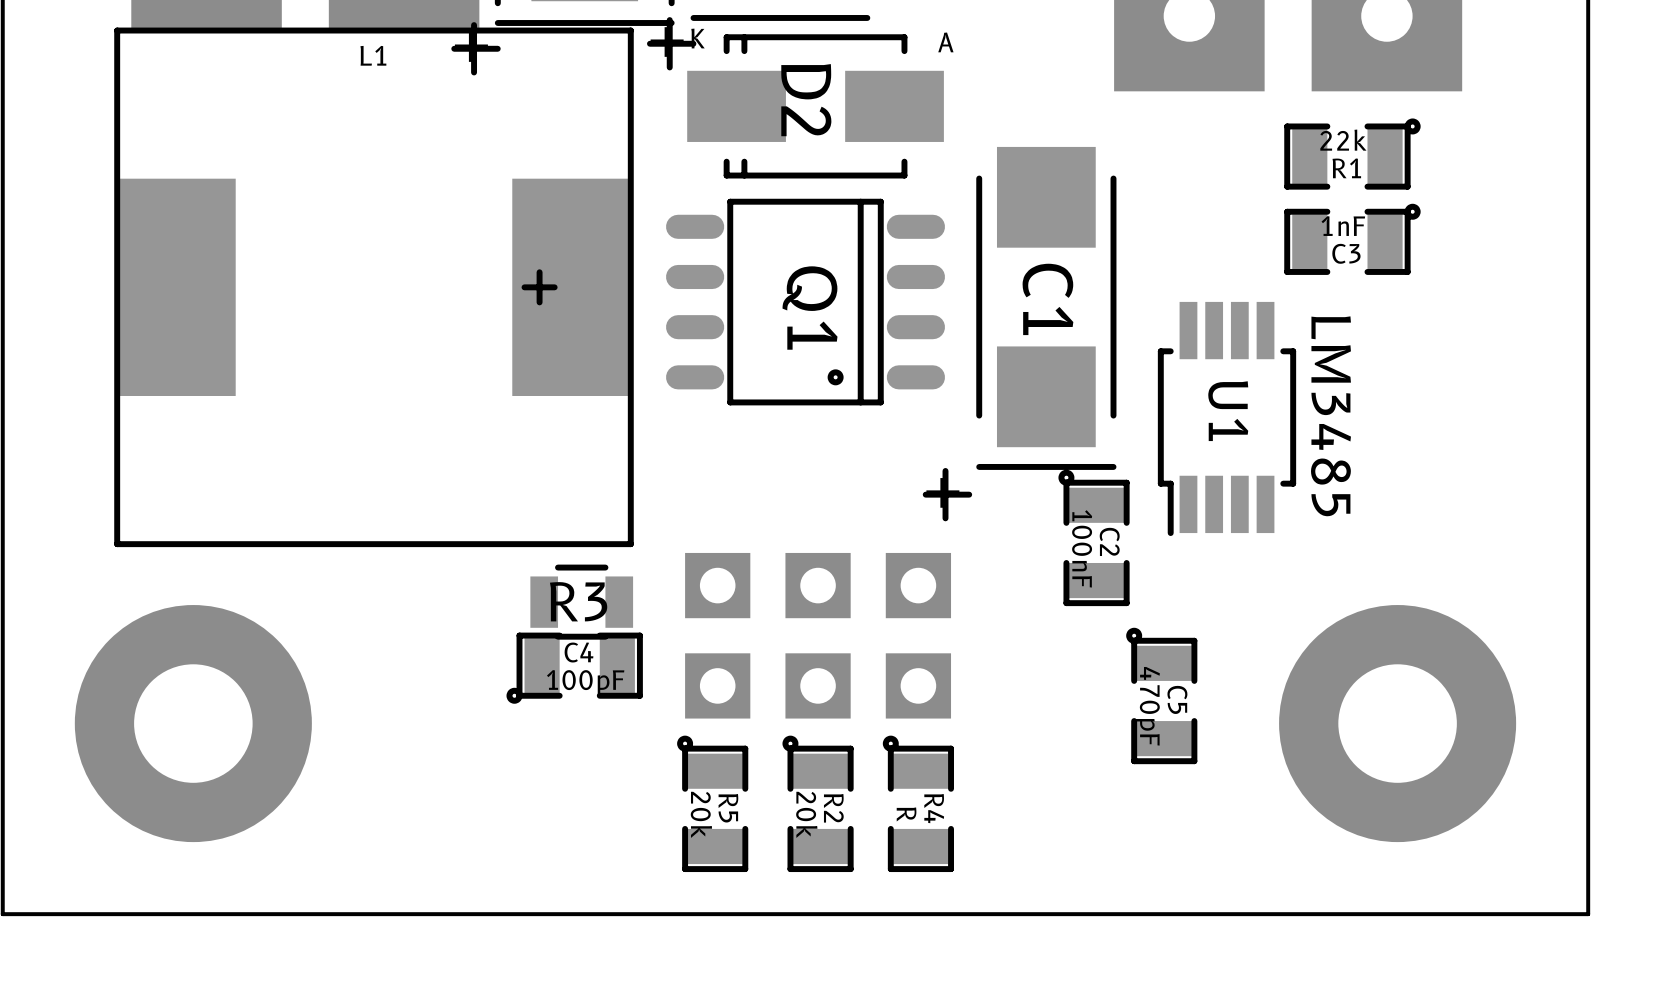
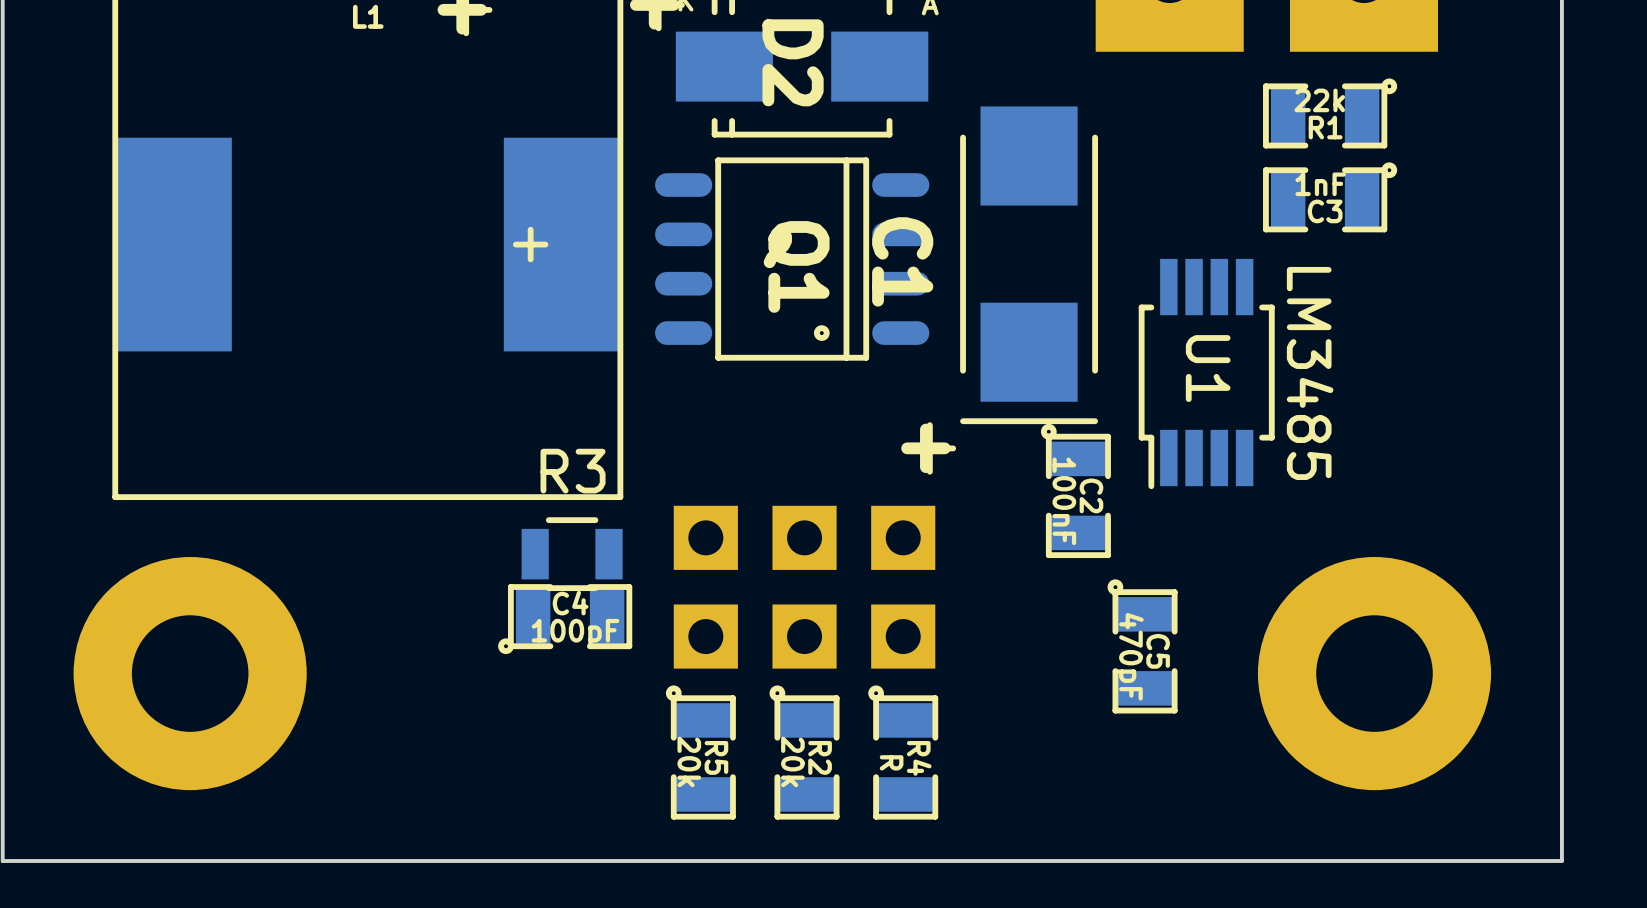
C1 name position: C1 (1047, 299) -> C1 (902, 261)
R3 name position: R3 (578, 601) -> R3 (573, 471)

